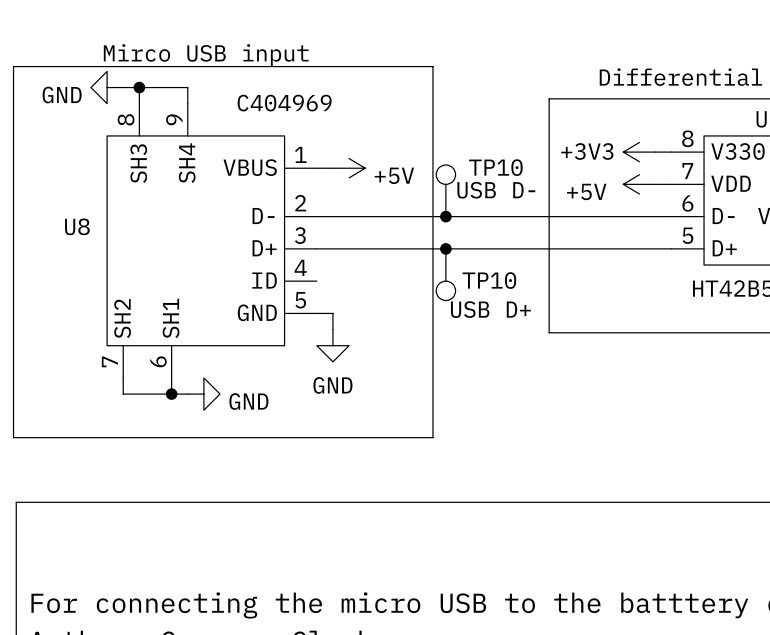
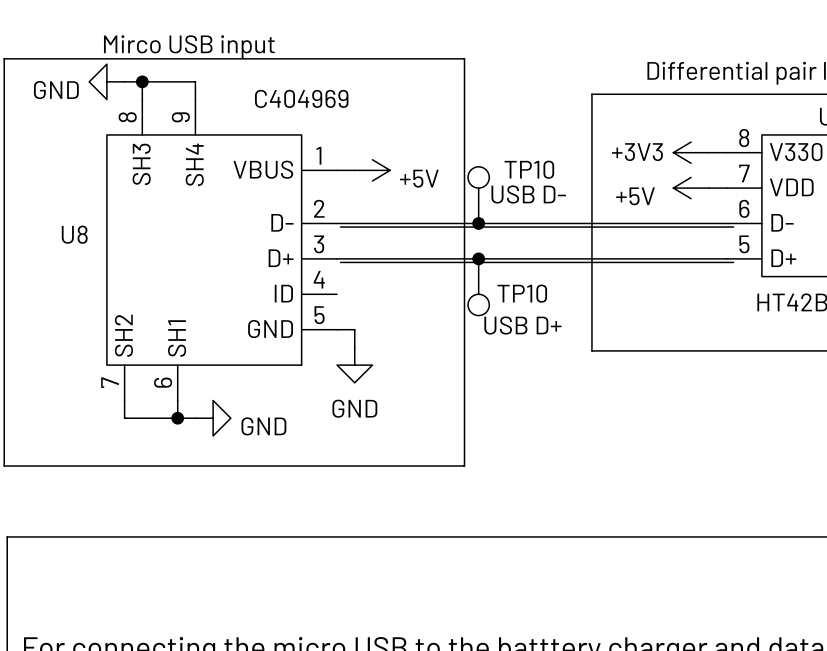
wire: none -> (340, 227) (733, 227)
wire: none -> (340, 262) (733, 262)

